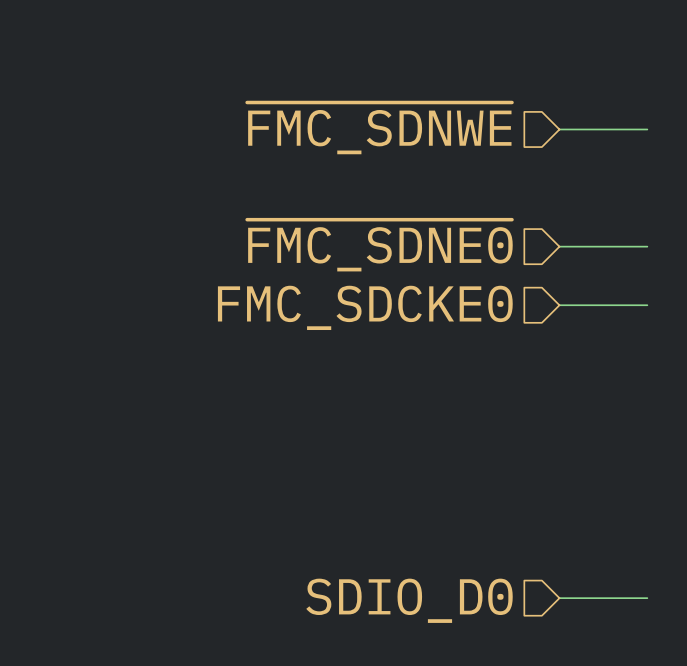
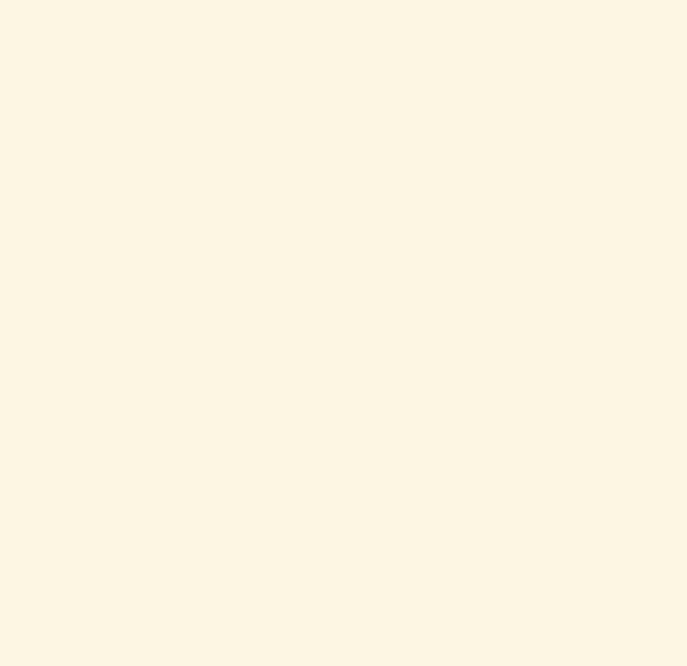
hierarchical label: ~{FMC_SDNWE} (379, 128) -> none
wire: (559, 129) (647, 129) -> none
hierarchical label: ~{FMC_SDNE0} (379, 245) -> none
wire: (559, 246) (647, 246) -> none
wire: (559, 305) (647, 305) -> none
hierarchical label: FMC_SDCKE0 (365, 307) -> none
wire: (559, 598) (647, 598) -> none
hierarchical label: SDIO_D0 (409, 600) -> none

